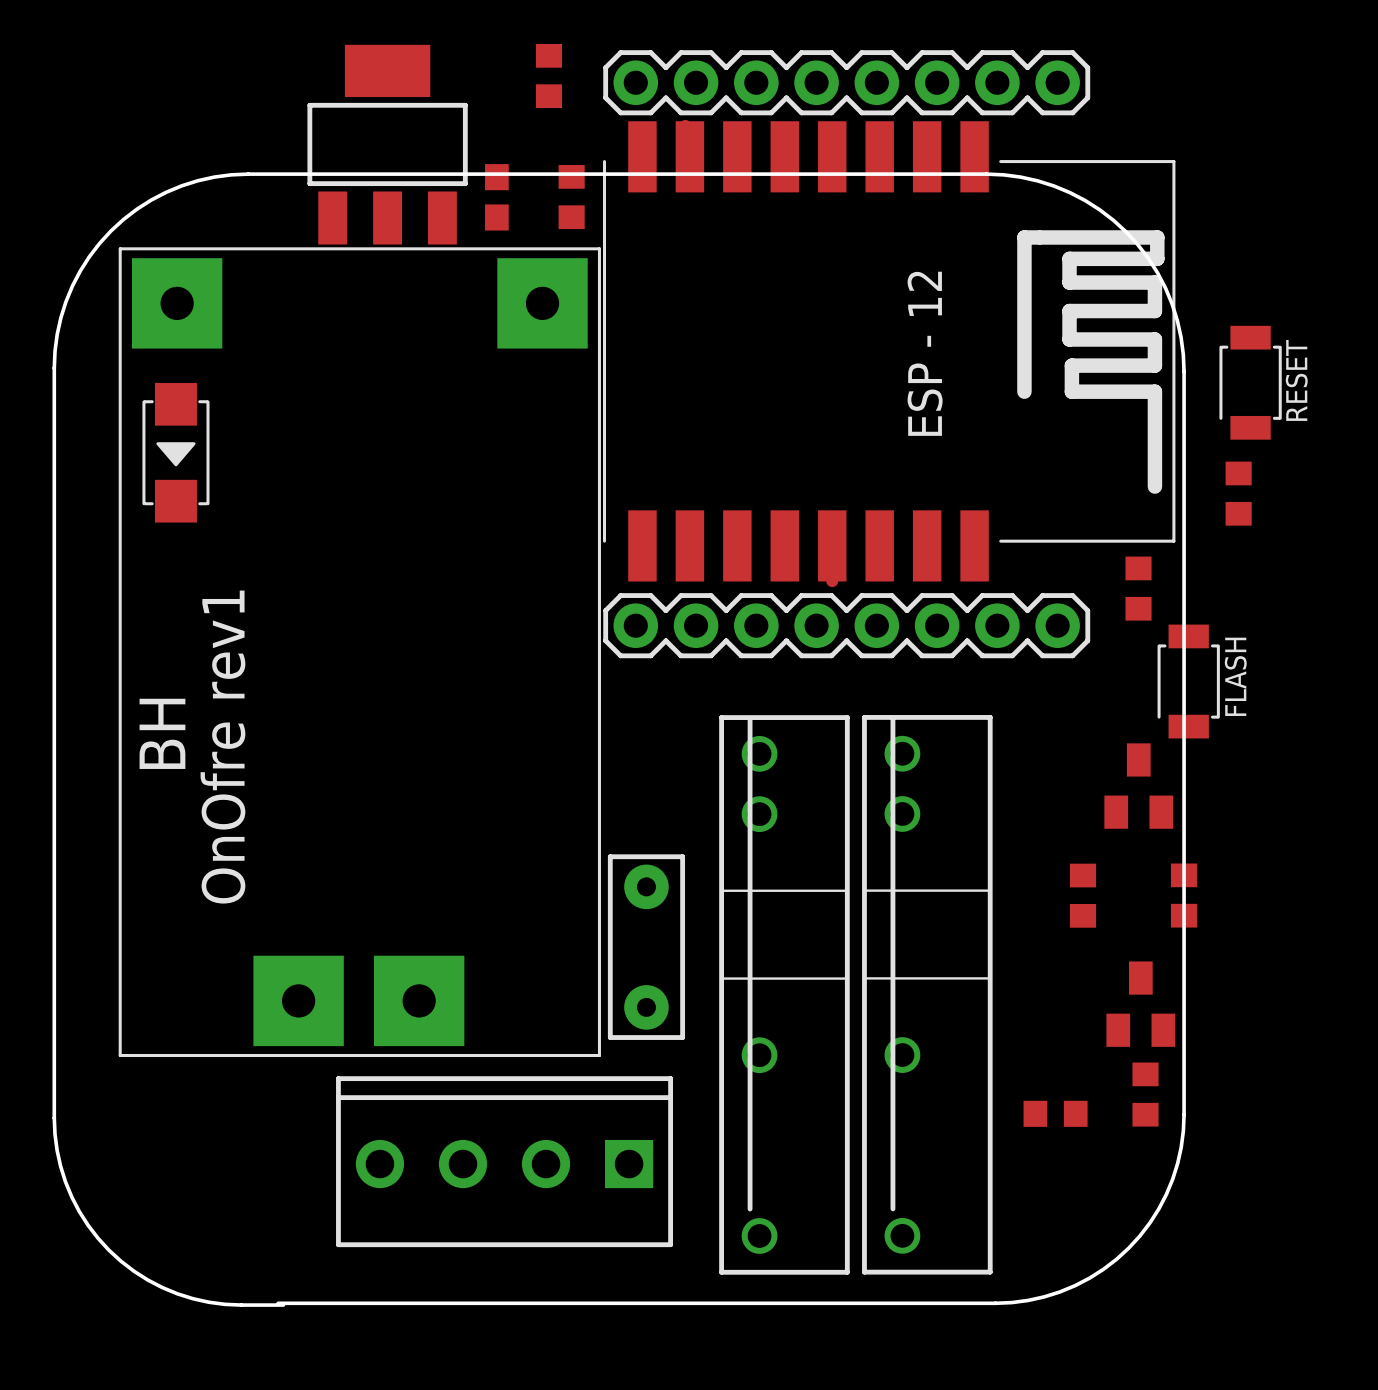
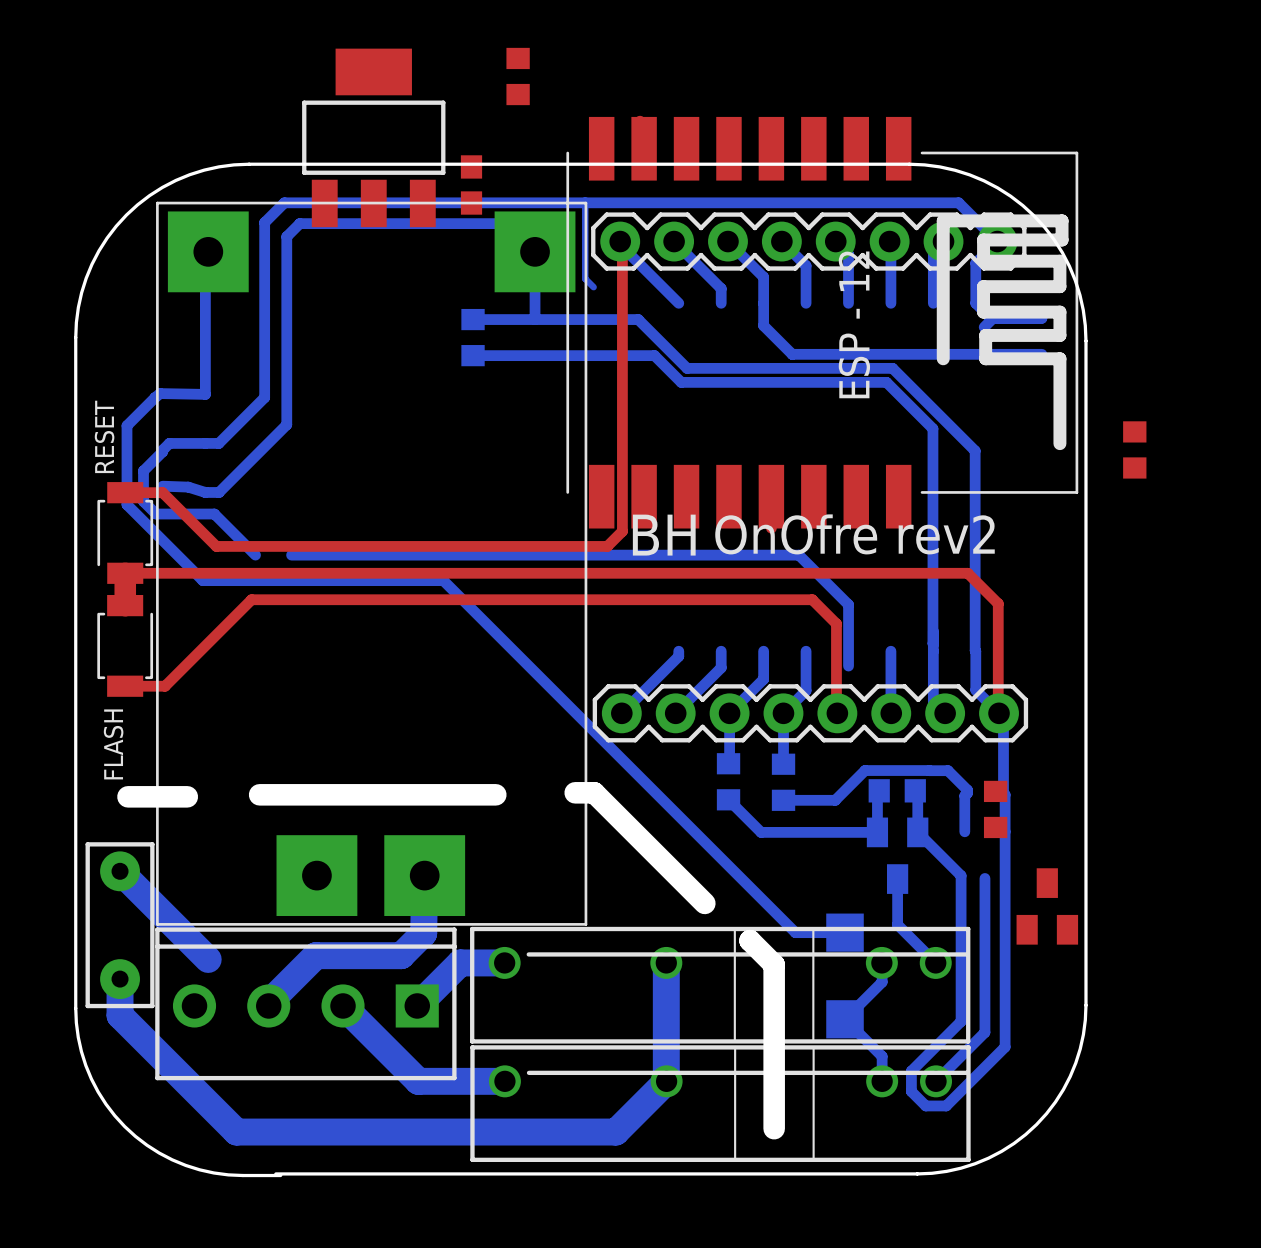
part position: (846, 82) -> (808, 241)
part side: top (571, 197) -> bottom (473, 337)
bottom track: none -> (585, 202) (585, 278) (593, 287)
top track: none -> (620, 241) (622, 243) (622, 531) (607, 546) (216, 546) (162, 492) (125, 492)
bottom track: none -> (620, 241) (620, 244) (678, 303)
bottom track: none -> (674, 241) (721, 288) (721, 303)
bottom track: none -> (727, 241) (763, 277) (763, 325) (792, 354) (1041, 354)
bottom track: none -> (781, 241) (806, 265) (806, 303)
bottom track: none -> (835, 241) (848, 254) (848, 303)
bottom track: none -> (889, 241) (890, 303)
bottom track: none -> (943, 241) (933, 251) (933, 303)
bottom track: none -> (208, 251) (205, 252) (205, 394) (160, 393) (126, 425) (126, 504) (202, 580) (443, 580) (795, 932) (845, 932)
bottom track: none -> (993, 318) (984, 327)
bottom track: none -> (1041, 318) (990, 318) (975, 303) (975, 263) (997, 241) (958, 202) (284, 202) (264, 222) (264, 397) (218, 443) (169, 443) (143, 470) (143, 501) (156, 514) (214, 514) (255, 555)
bottom track: none -> (473, 319) (638, 319) (687, 368) (892, 368) (975, 450) (975, 690) (1003, 717)
bottom track: none -> (535, 319) (535, 245) (512, 223) (299, 223) (286, 236) (286, 424) (219, 492) (205, 492) (188, 487) (162, 486)
RESET: (1250, 382) -> none
bottom track: none -> (473, 355) (654, 355) (681, 382) (886, 382) (932, 428) (933, 643)
part: (175, 452) -> none
RESET: none -> (125, 532)
text: none -> BH (664, 535)
text: none -> OnOfre rev2 (855, 534)
part: (1138, 588) -> none
bottom track: none -> (291, 555) (798, 555) (848, 604) (848, 666)
part position: (846, 625) -> (810, 713)
part position: (359, 652) -> (371, 563)
top track: none -> (125, 605) (125, 573) (967, 573) (998, 603) (999, 713)
FLASH: (1188, 681) -> none
bottom track: none -> (933, 631) (933, 701) (945, 713)
FLASH: none -> (125, 645)
bottom track: none -> (678, 651) (678, 656) (621, 713)
bottom track: none -> (721, 651) (721, 667) (675, 713)
bottom track: none -> (763, 651) (763, 679) (729, 713) (728, 763)
bottom track: none -> (806, 651) (806, 690) (783, 713) (783, 764)
bottom track: none -> (890, 651) (891, 713)
text: BH (162, 733) -> none
text: OnOfre rev1 (222, 747) -> none
top track: none -> (125, 686) (165, 686) (251, 599) (812, 599) (836, 623) (837, 713)
part side: top (1138, 786) -> bottom (897, 855)
bottom track: none -> (1003, 717) (1005, 1047) (946, 1105) (925, 1105) (911, 1091) (911, 1071) (961, 1021) (961, 875) (917, 832) (917, 793) (915, 790)
bottom track: none -> (879, 790) (877, 792) (877, 832) (761, 832) (728, 799)
part: none -> (897, 790)
board edge: none -> (575, 792) (594, 792) (704, 903)
board edge: none -> (259, 794) (495, 794)
board edge: none -> (127, 796) (187, 796)
bottom track: none -> (783, 800) (835, 800) (865, 770) (948, 770) (967, 790) (964, 795) (964, 831)
part side: top (1183, 895) -> bottom (728, 781)
part position: (646, 947) -> (120, 925)
bottom track: none -> (120, 871) (208, 959)
bottom track: none -> (424, 875) (423, 933) (401, 955) (315, 955) (268, 1002) (268, 1005)
bottom track: none -> (984, 878) (984, 1032) (936, 1081)
bottom track: none -> (897, 879) (897, 924) (935, 962)
part: (784, 994) -> none
part: (927, 994) -> none
board edge: none -> (750, 940) (774, 964) (774, 1128)
bottom track: none -> (504, 962) (460, 962) (417, 1005)
bottom track: none -> (666, 962) (666, 1081)
bottom track: none -> (882, 963) (882, 982) (845, 1019) (882, 1056) (882, 1081)
part: none -> (845, 975)
bottom track: none -> (120, 979) (120, 1015) (236, 1132) (615, 1132) (666, 1081)
part: none -> (720, 985)
part: (1145, 1094) -> none
part side: top (1055, 1113) -> bottom (783, 782)
bottom track: none -> (343, 1005) (418, 1081) (504, 1081)
part position: (504, 1161) -> (305, 1003)
part: none -> (720, 1103)

